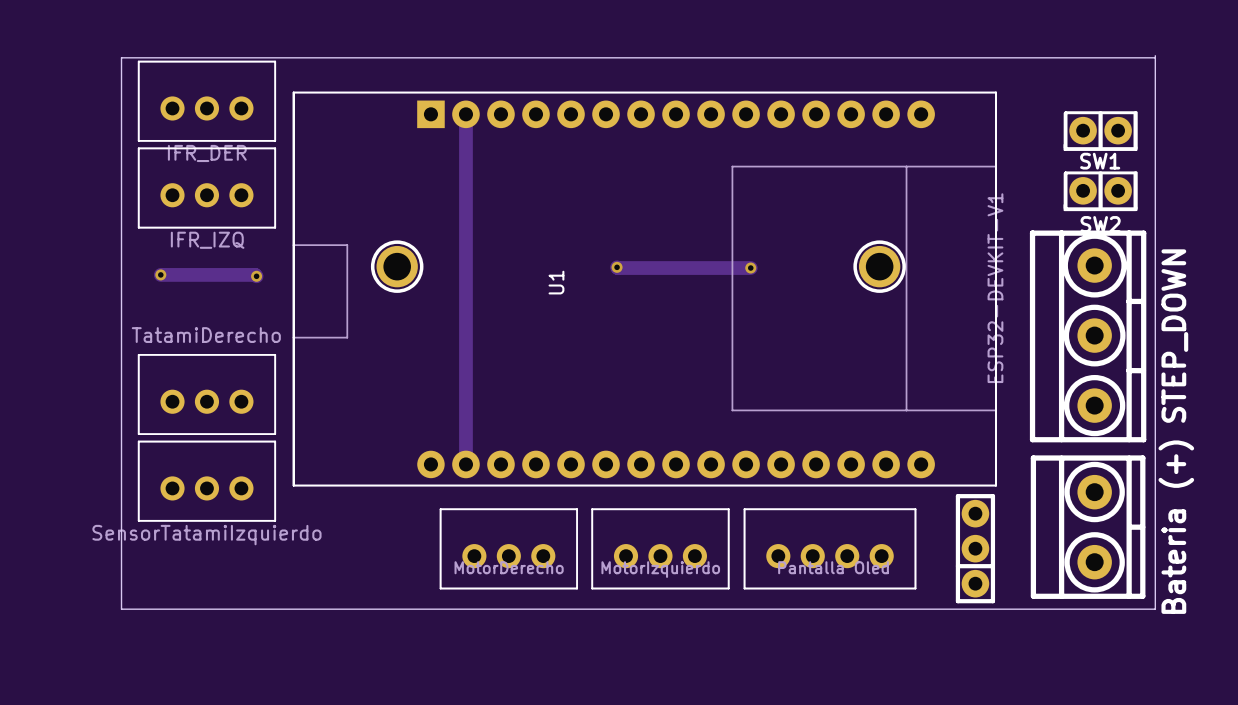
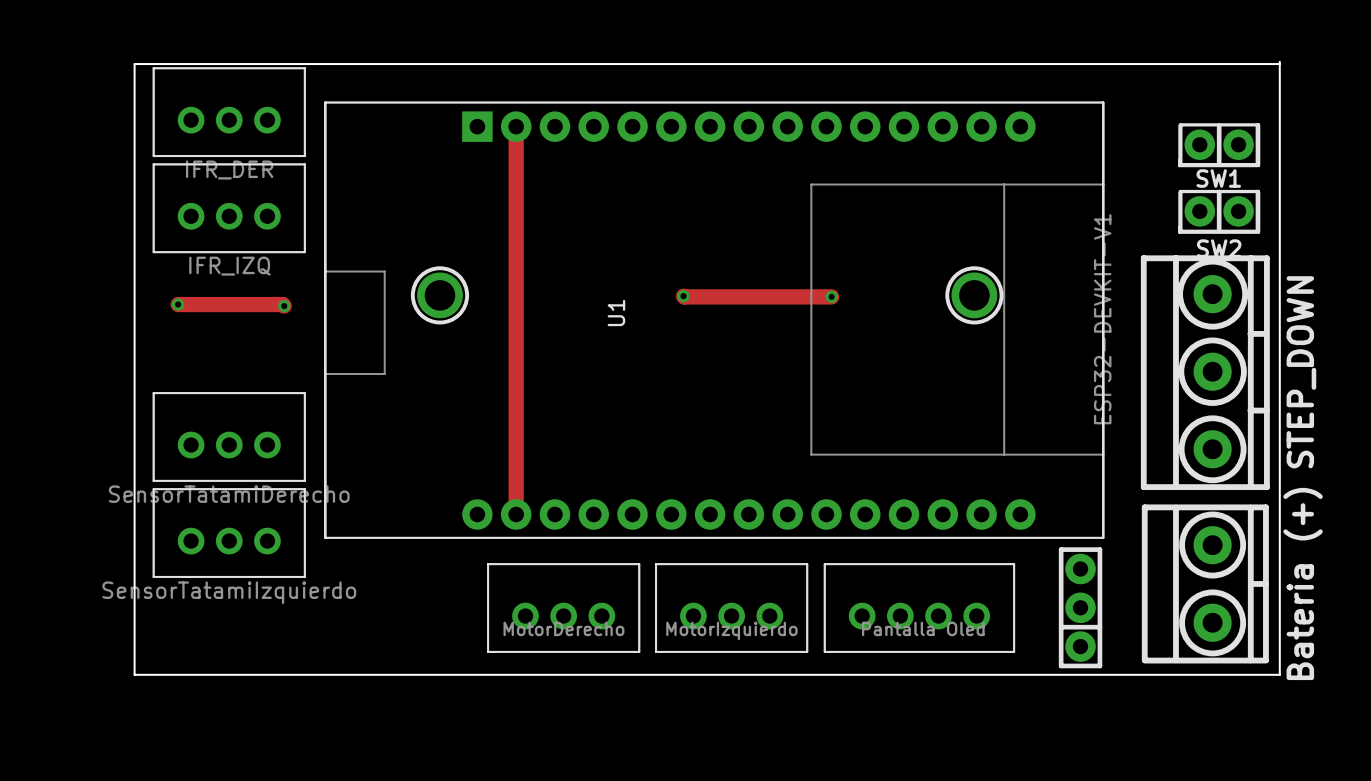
part value: TatamiDerecho (206, 335) -> SensorTatamiDerecho (229, 494)

